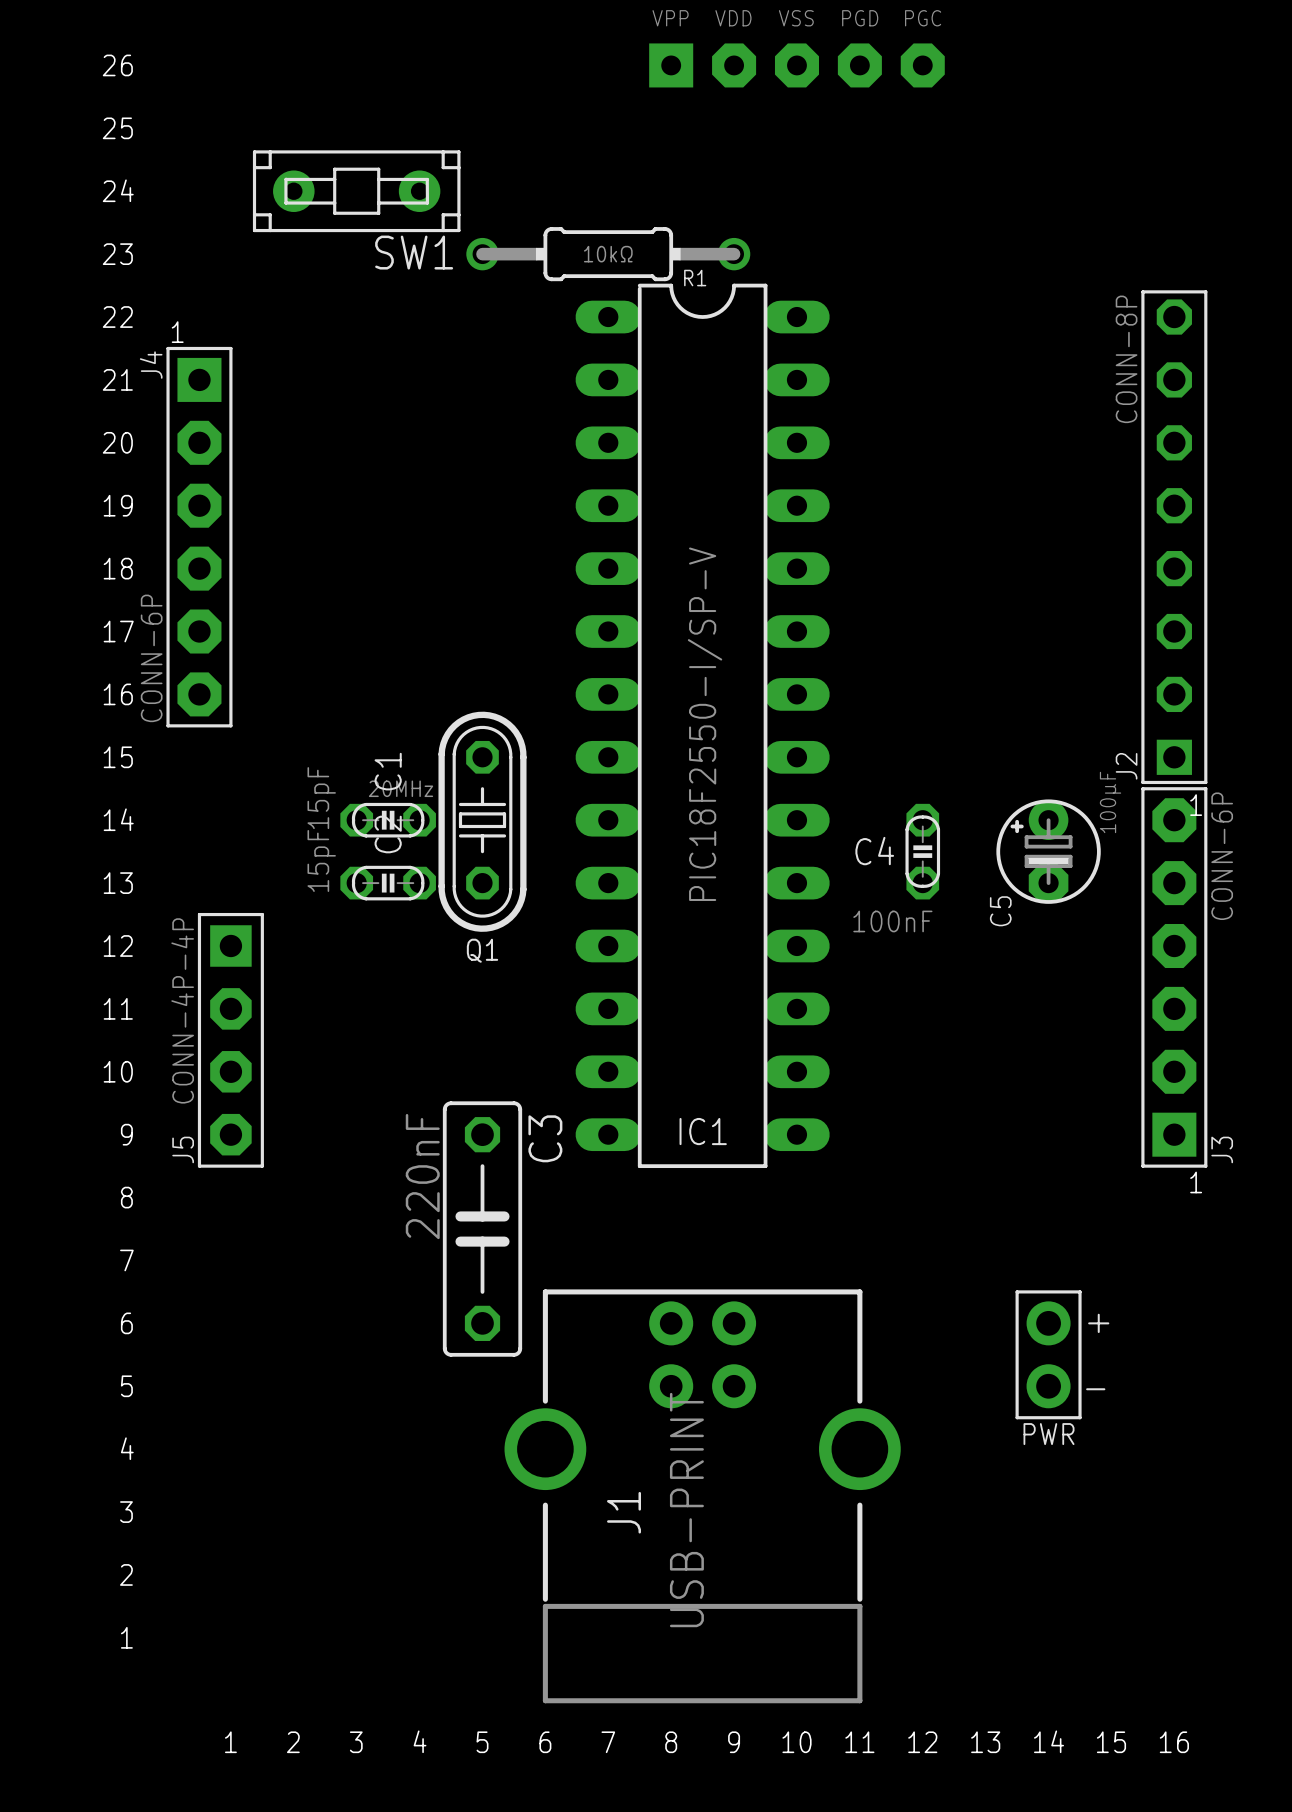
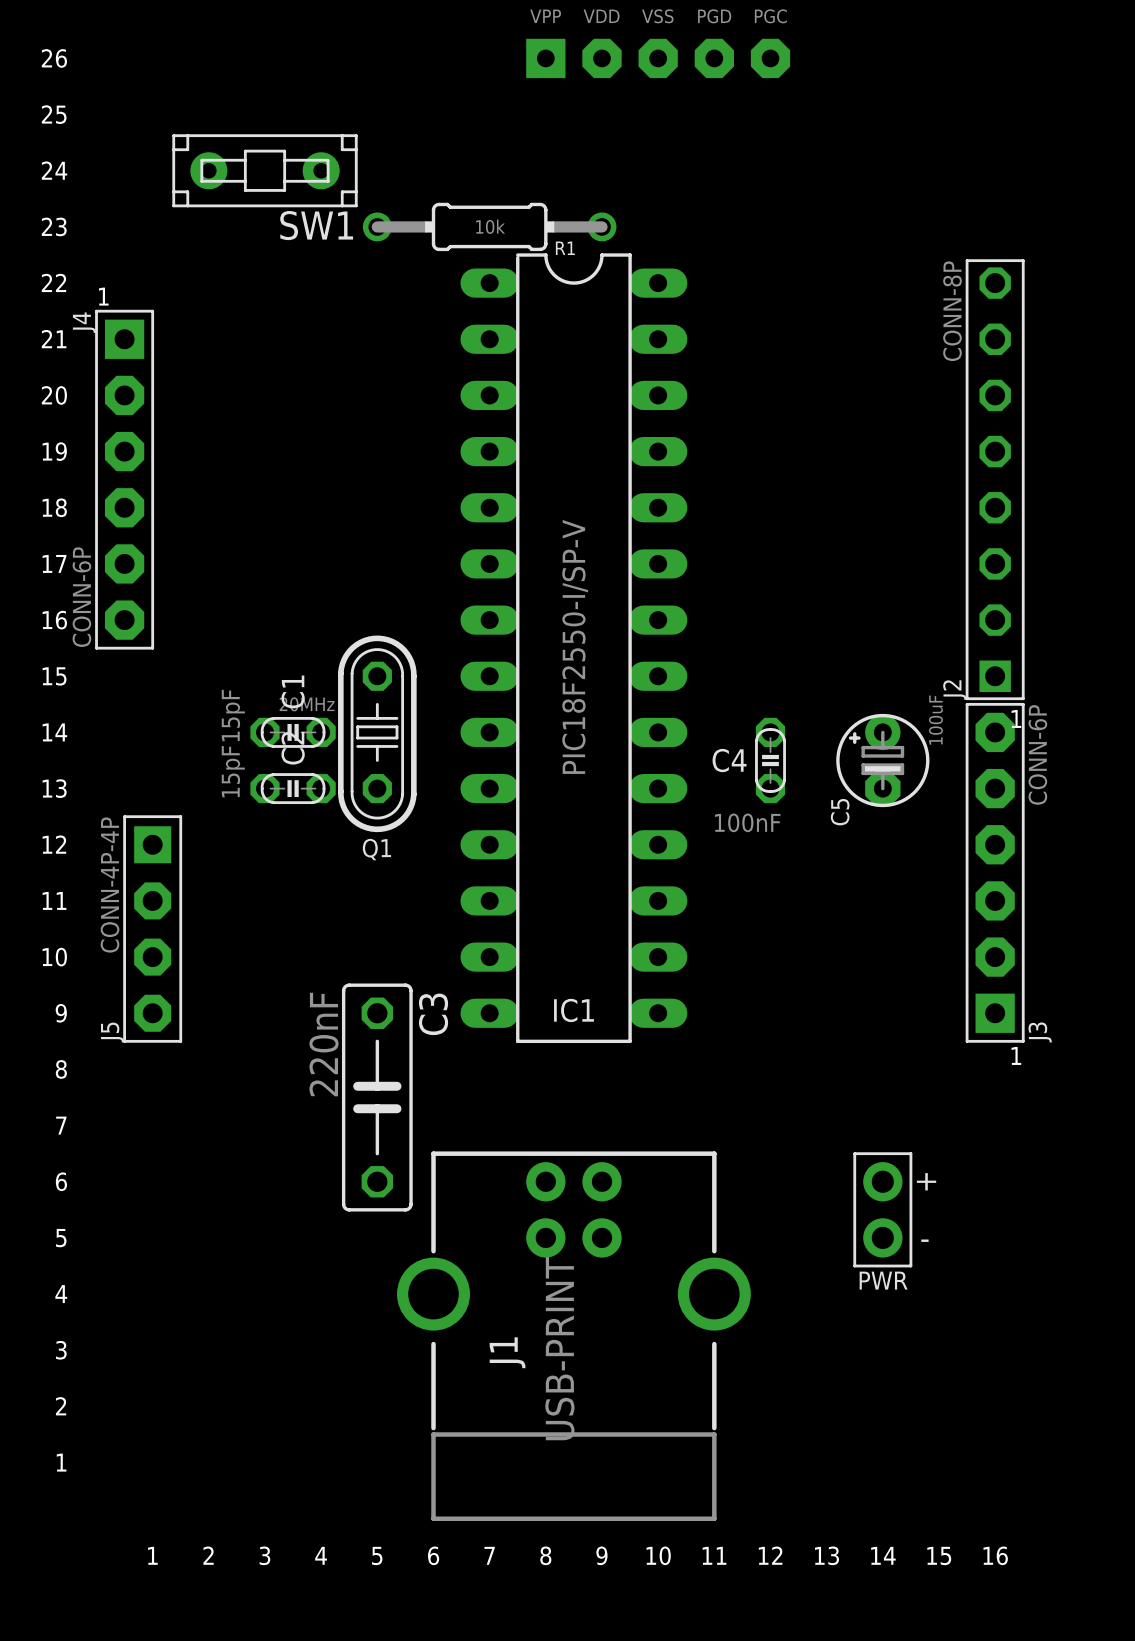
R1 value: 10kΩ (608, 254) -> 10k (490, 226)
C5 value: 100μF (1110, 802) -> 100uF (935, 720)

